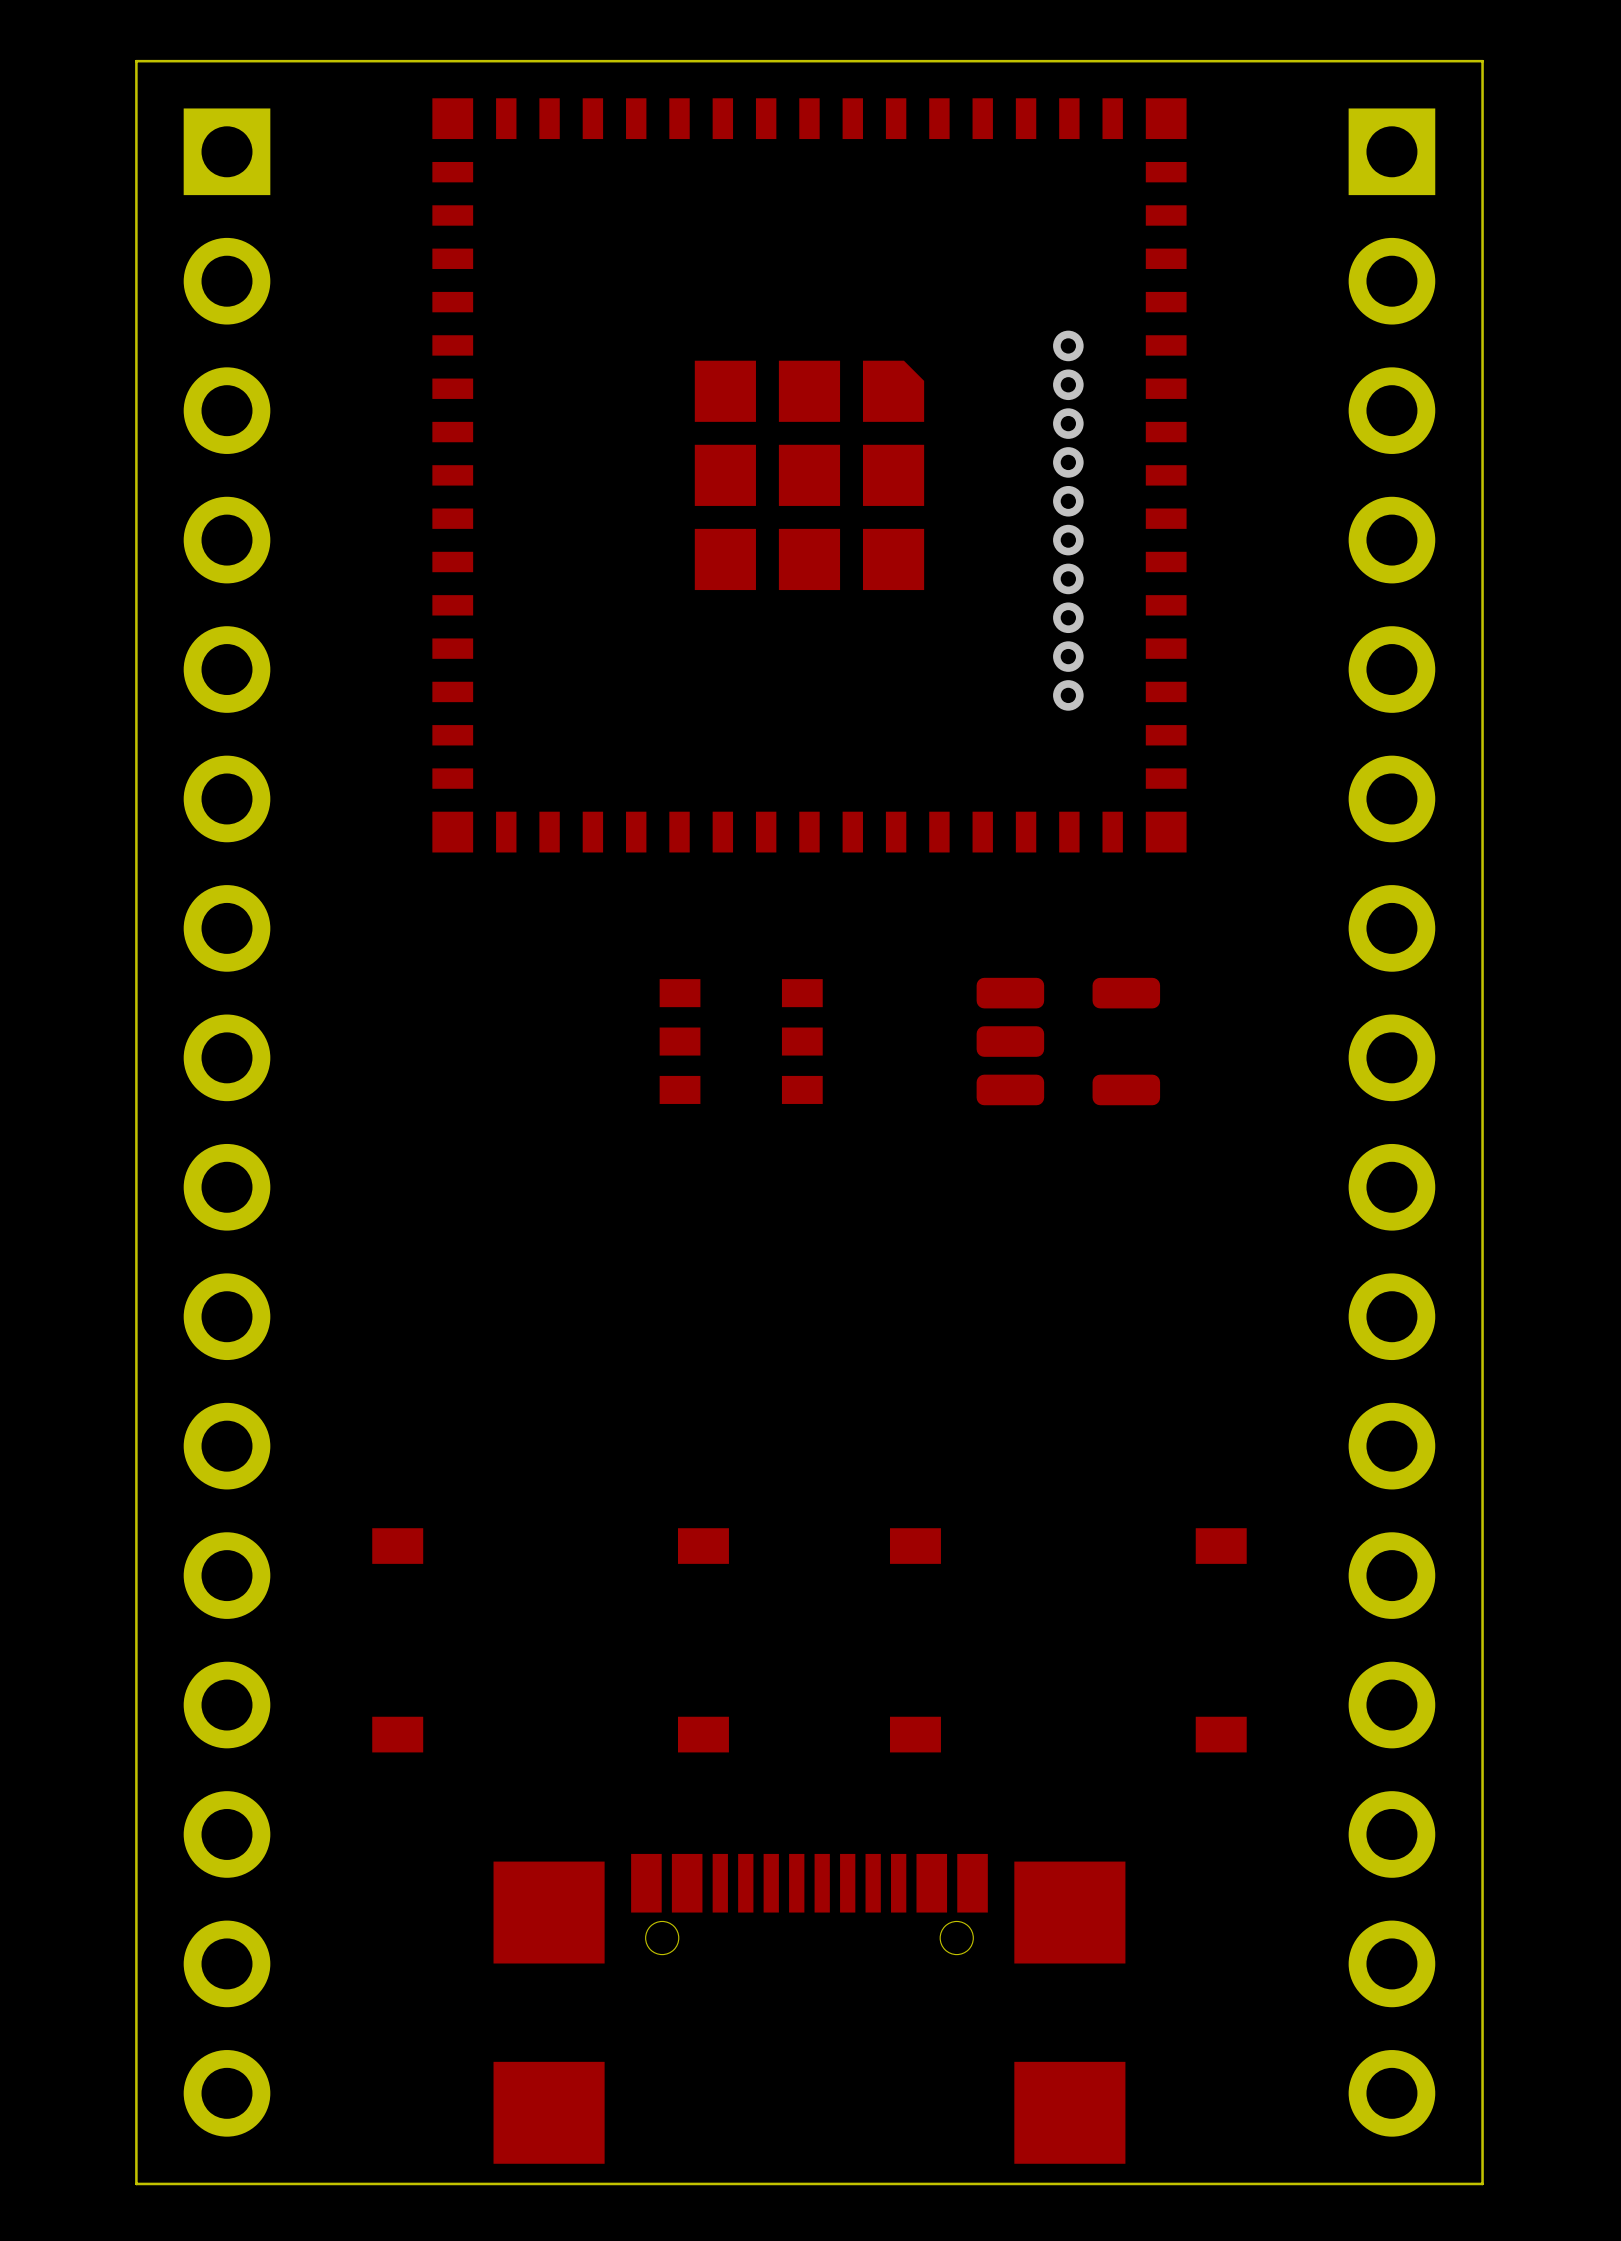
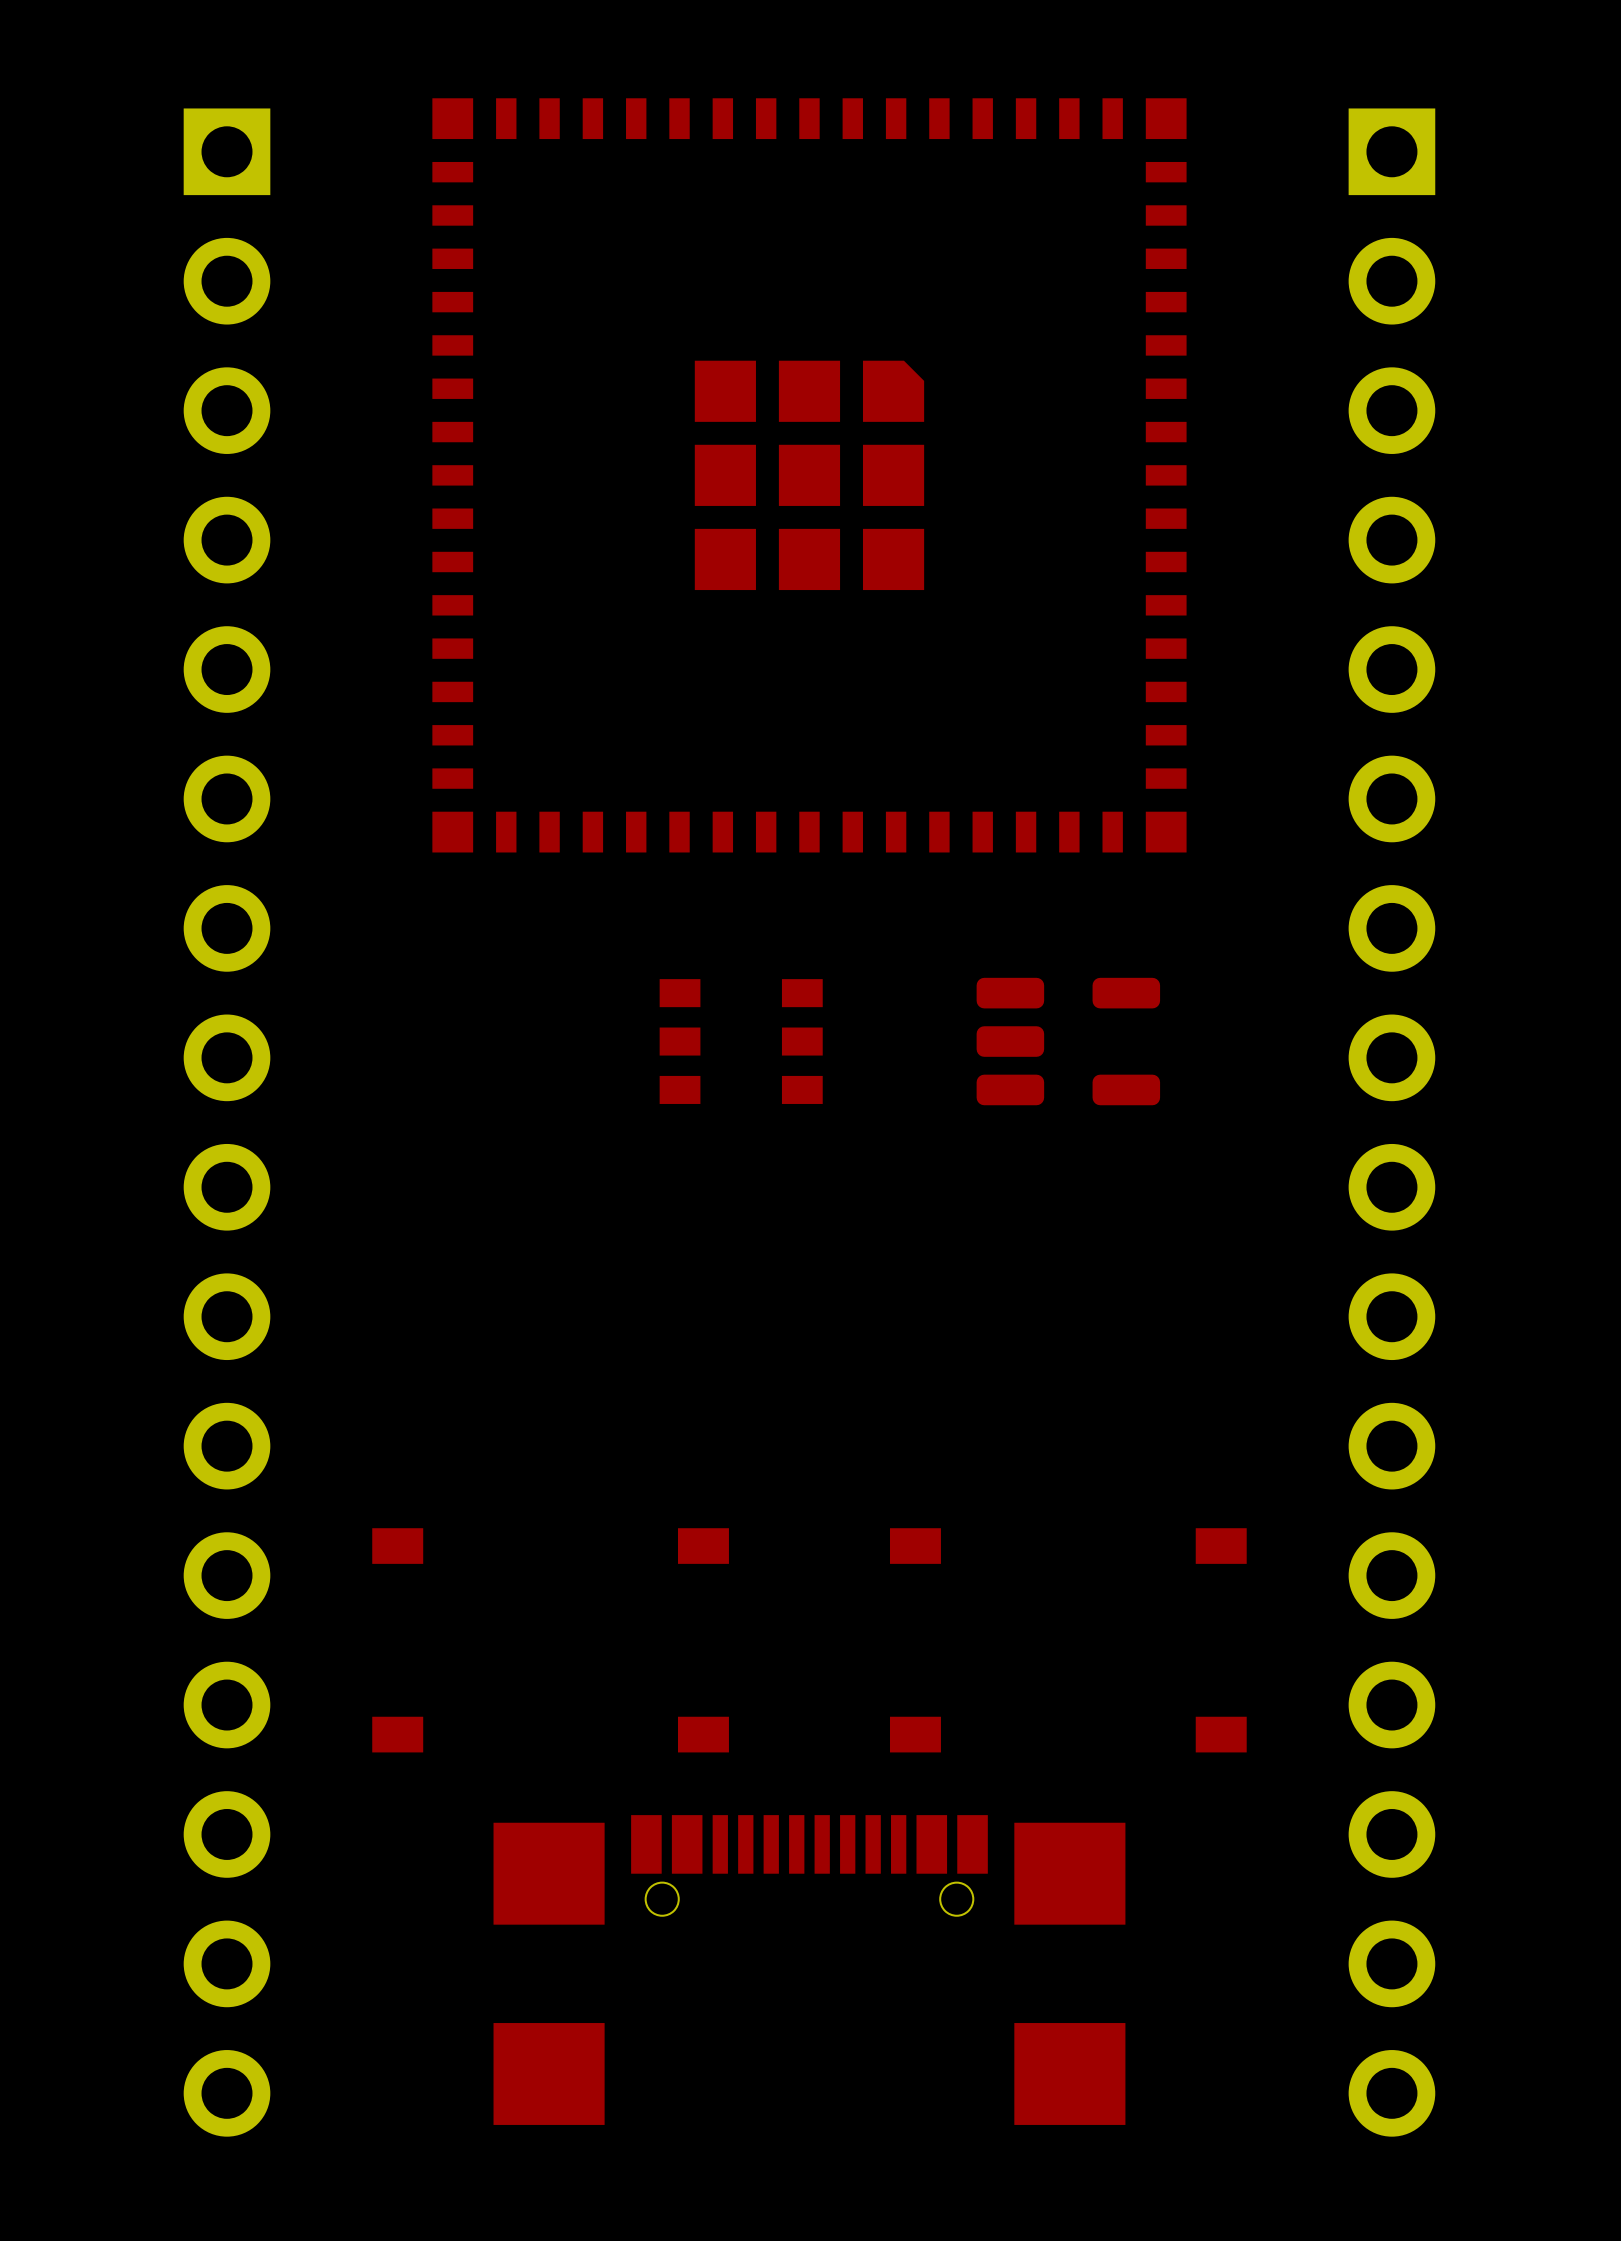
board edge: (1482, 61) (136, 61) (136, 2183) (1482, 2183) (1482, 61) -> none
via: (1068, 345) -> none
via: (1068, 384) -> none
via: (1068, 423) -> none
via: (1068, 462) -> none
via: (1068, 501) -> none
via: (1068, 540) -> none
via: (1068, 578) -> none
via: (1068, 617) -> none
via: (1068, 656) -> none
via: (1068, 695) -> none
part position: (809, 2008) -> (809, 1970)

